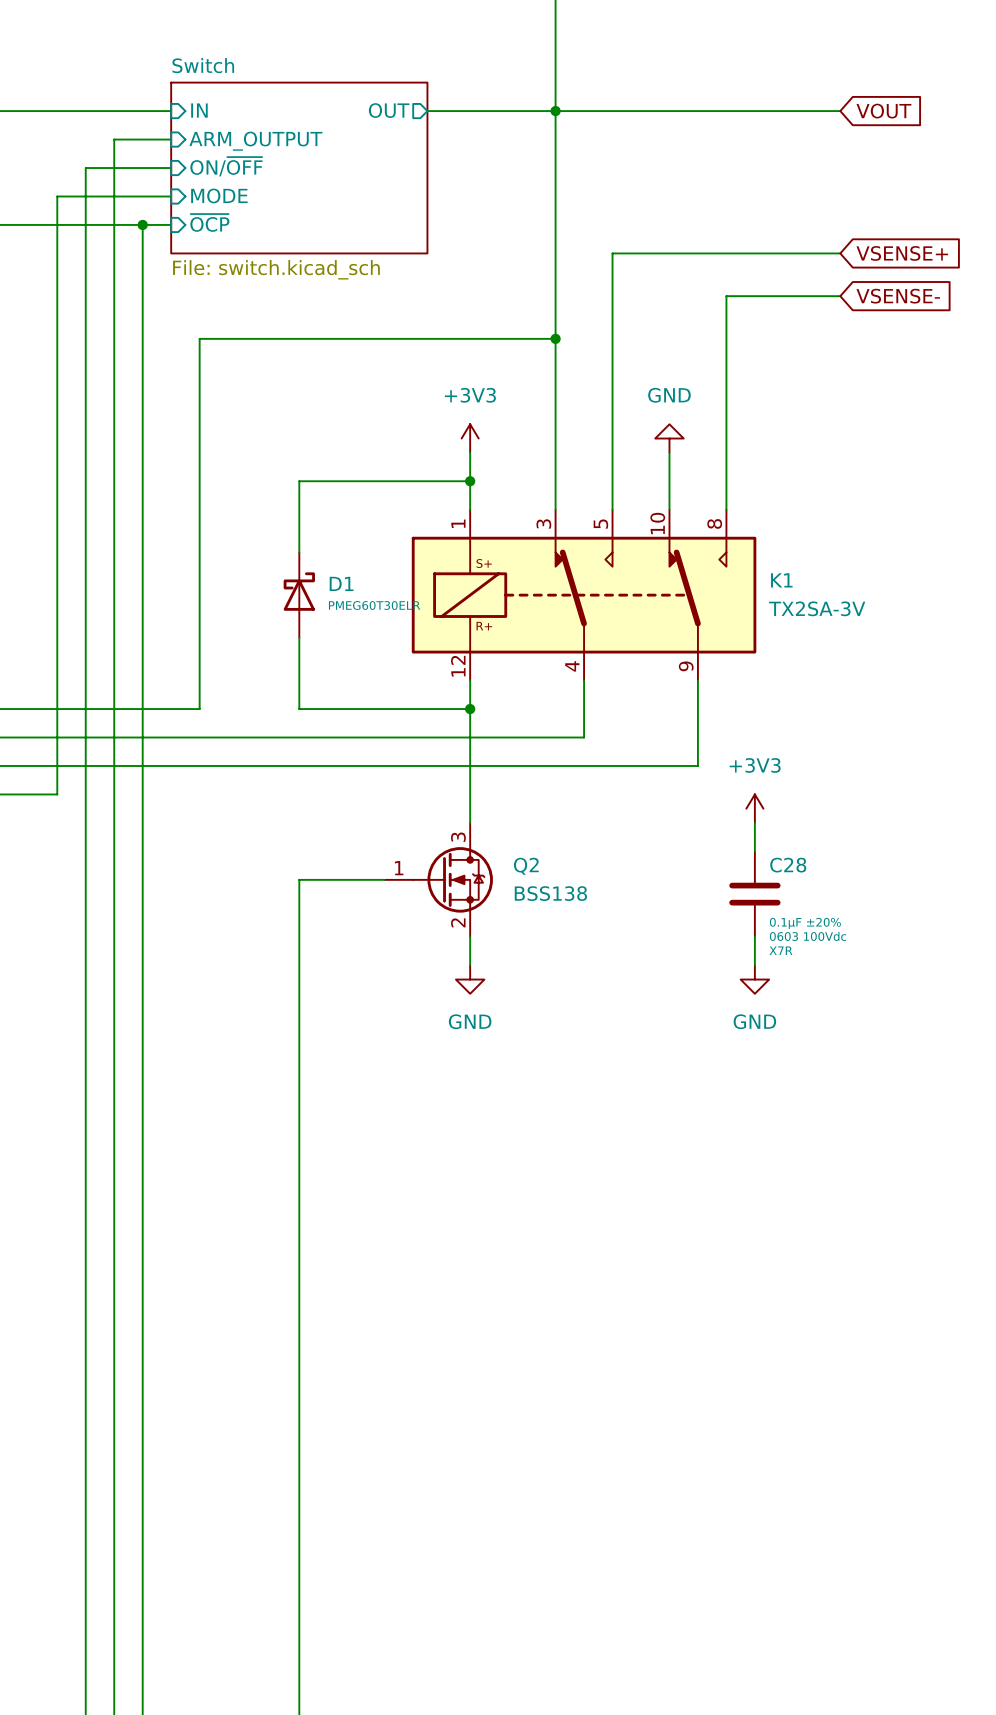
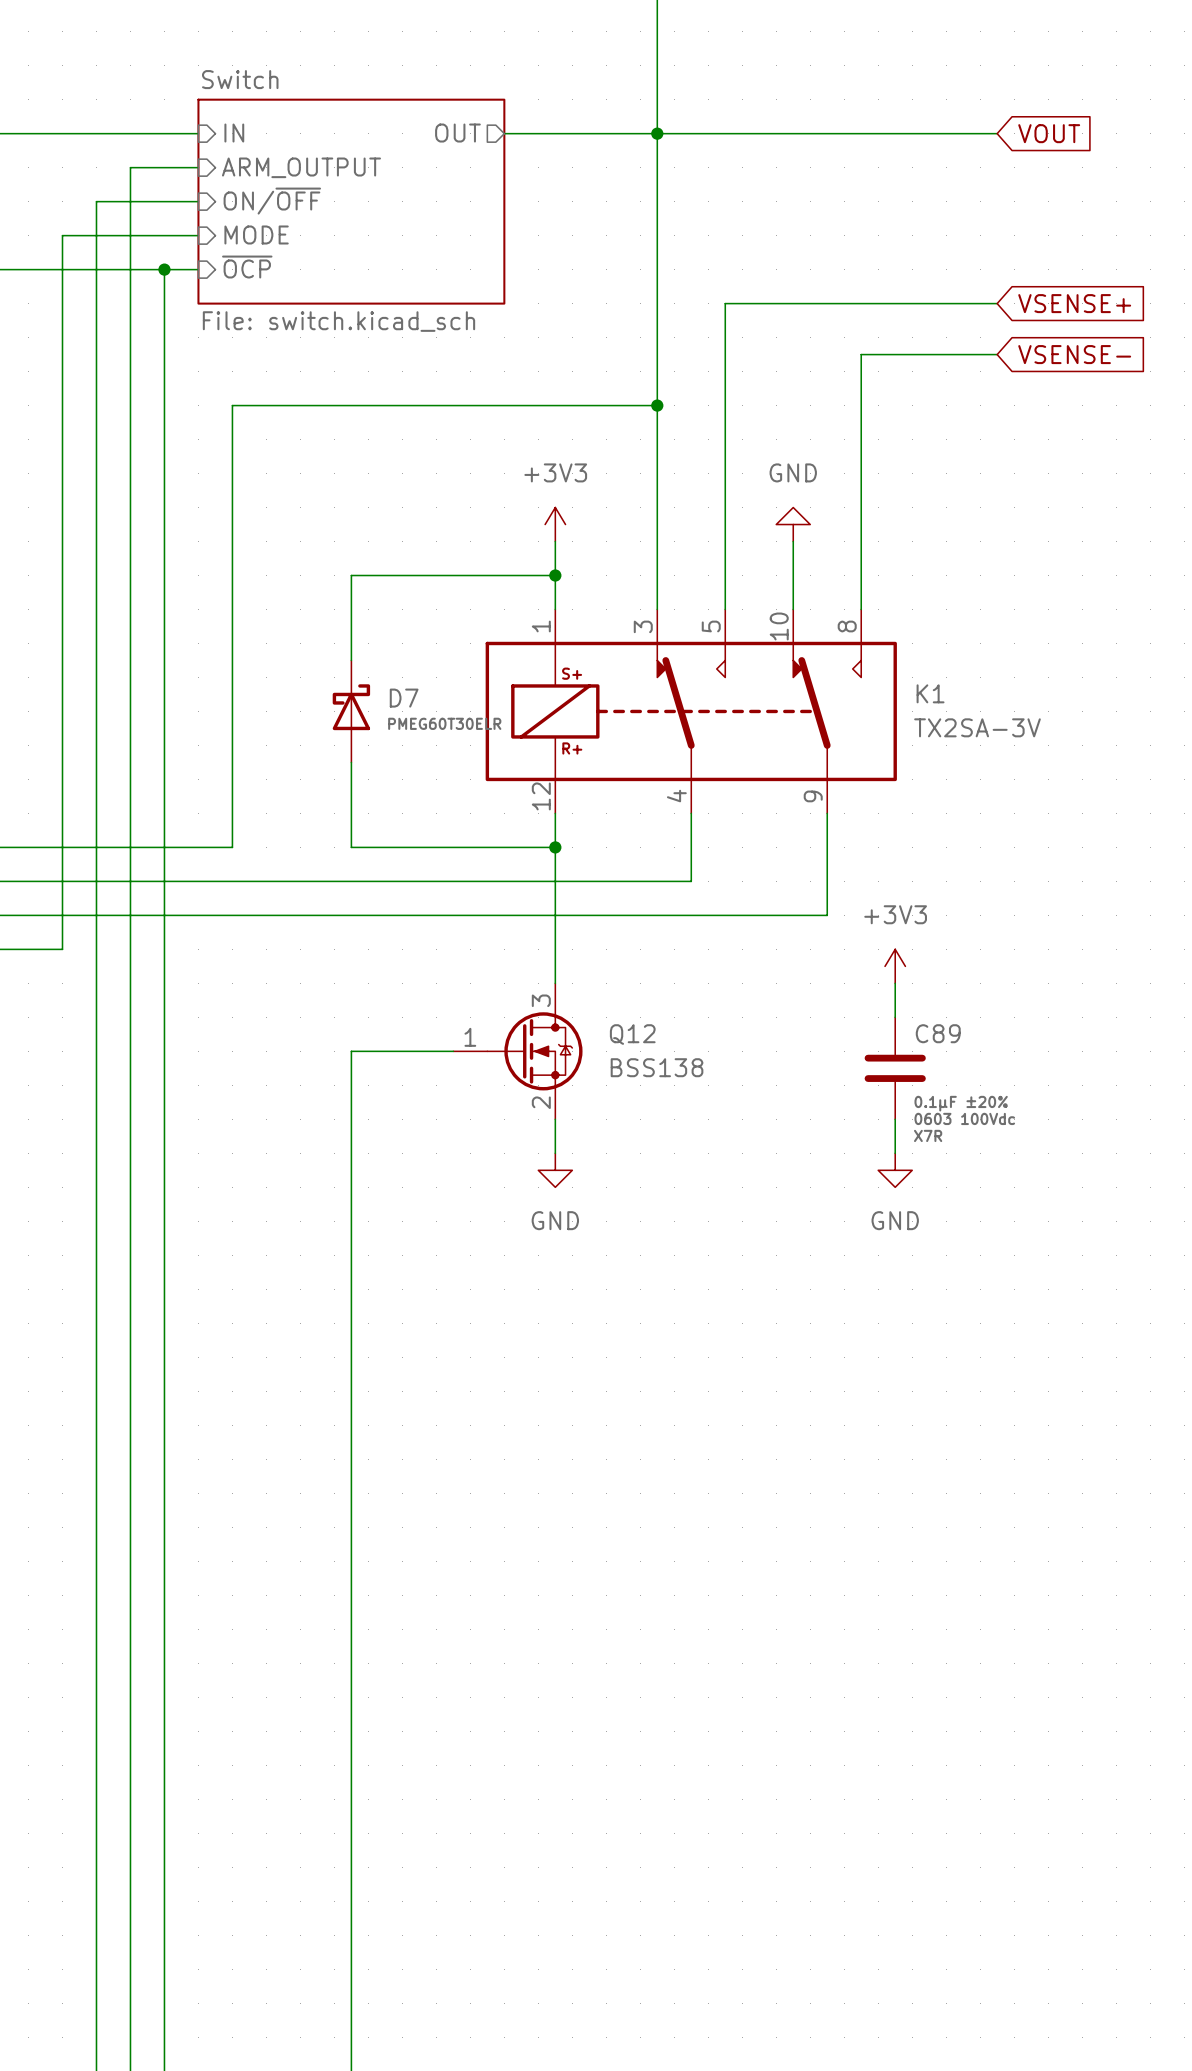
D1 name: D1 (341, 583) -> D7 (404, 698)
C28 name: C28 (788, 865) -> C89 (938, 1033)
Q2 name: Q2 (526, 866) -> Q12 (632, 1034)

